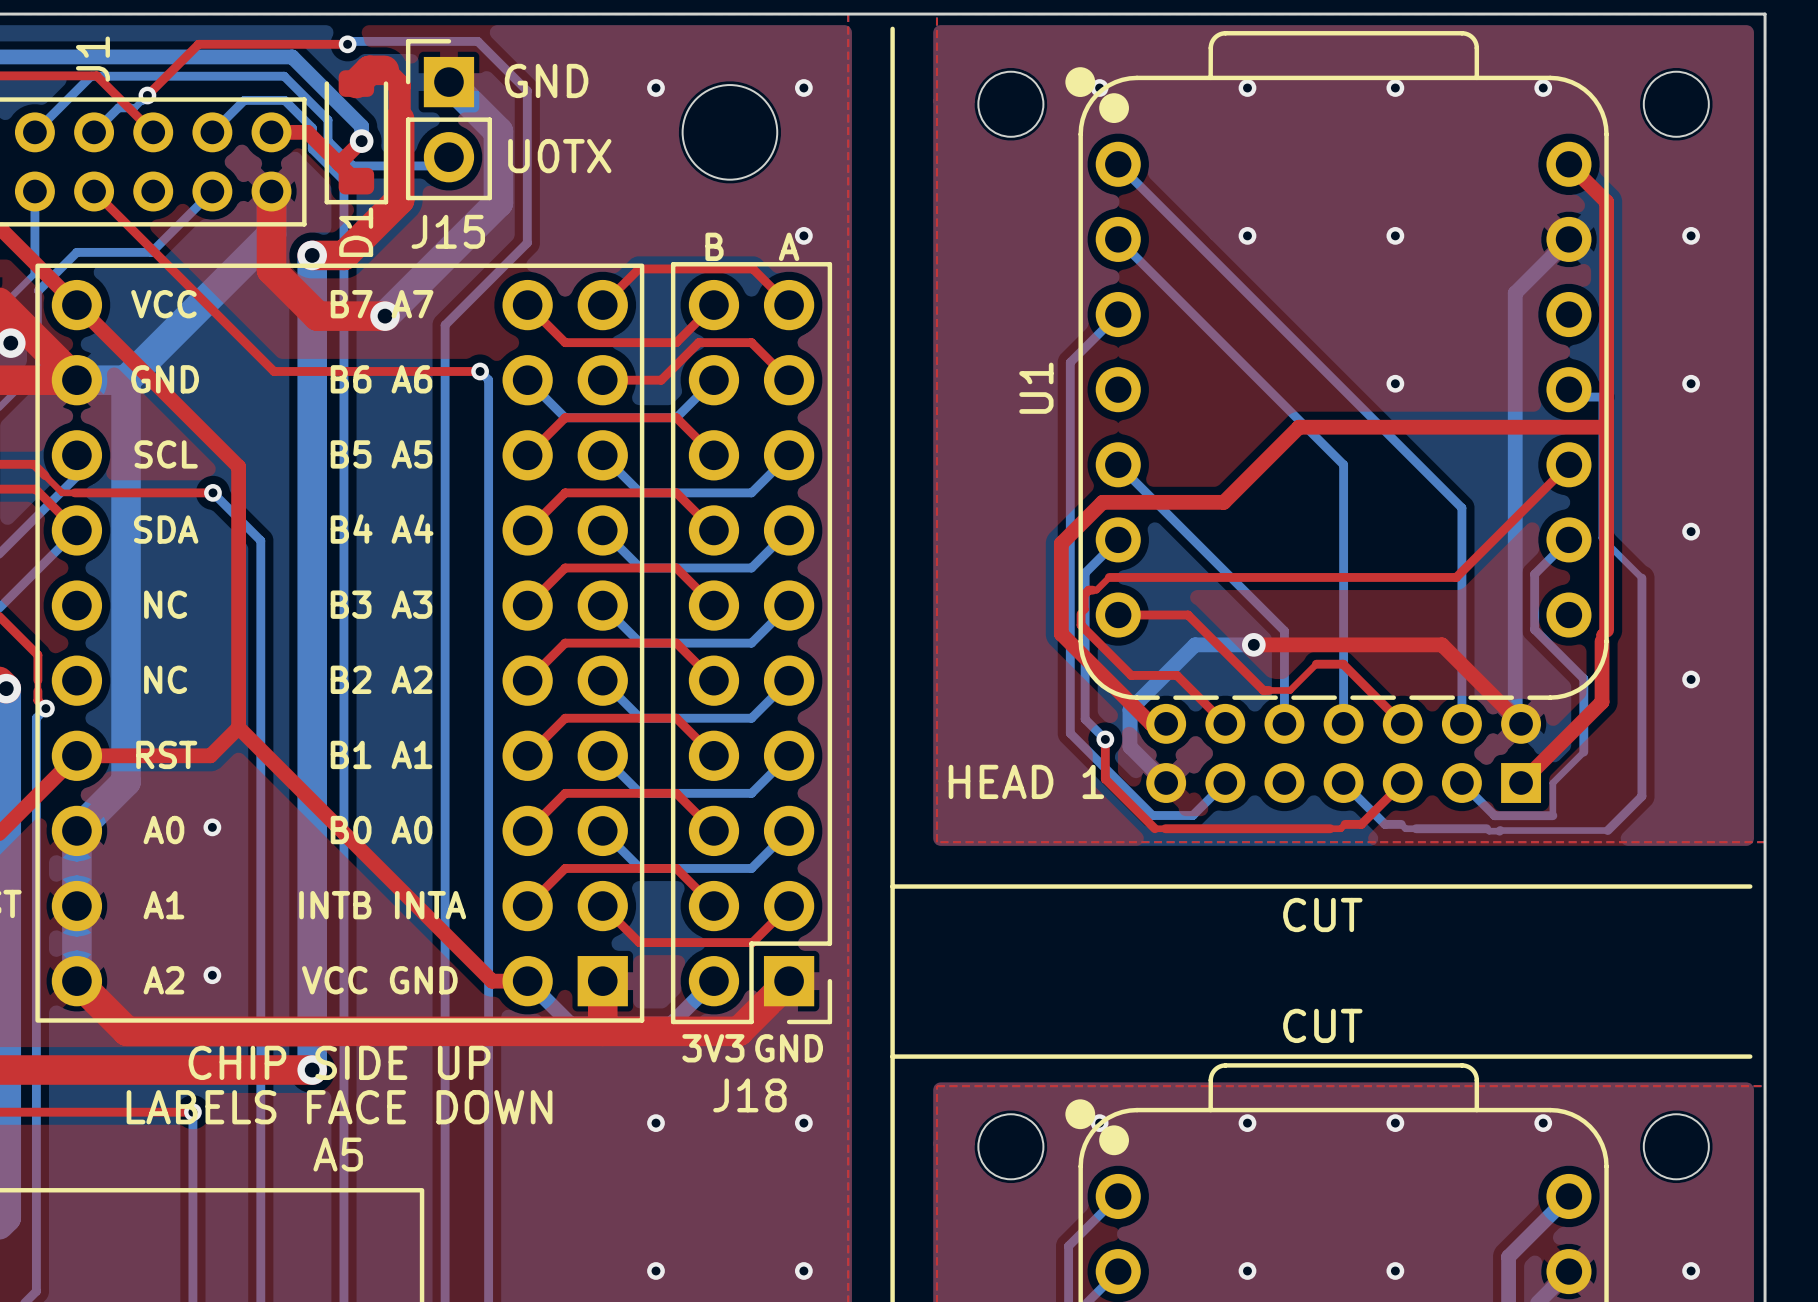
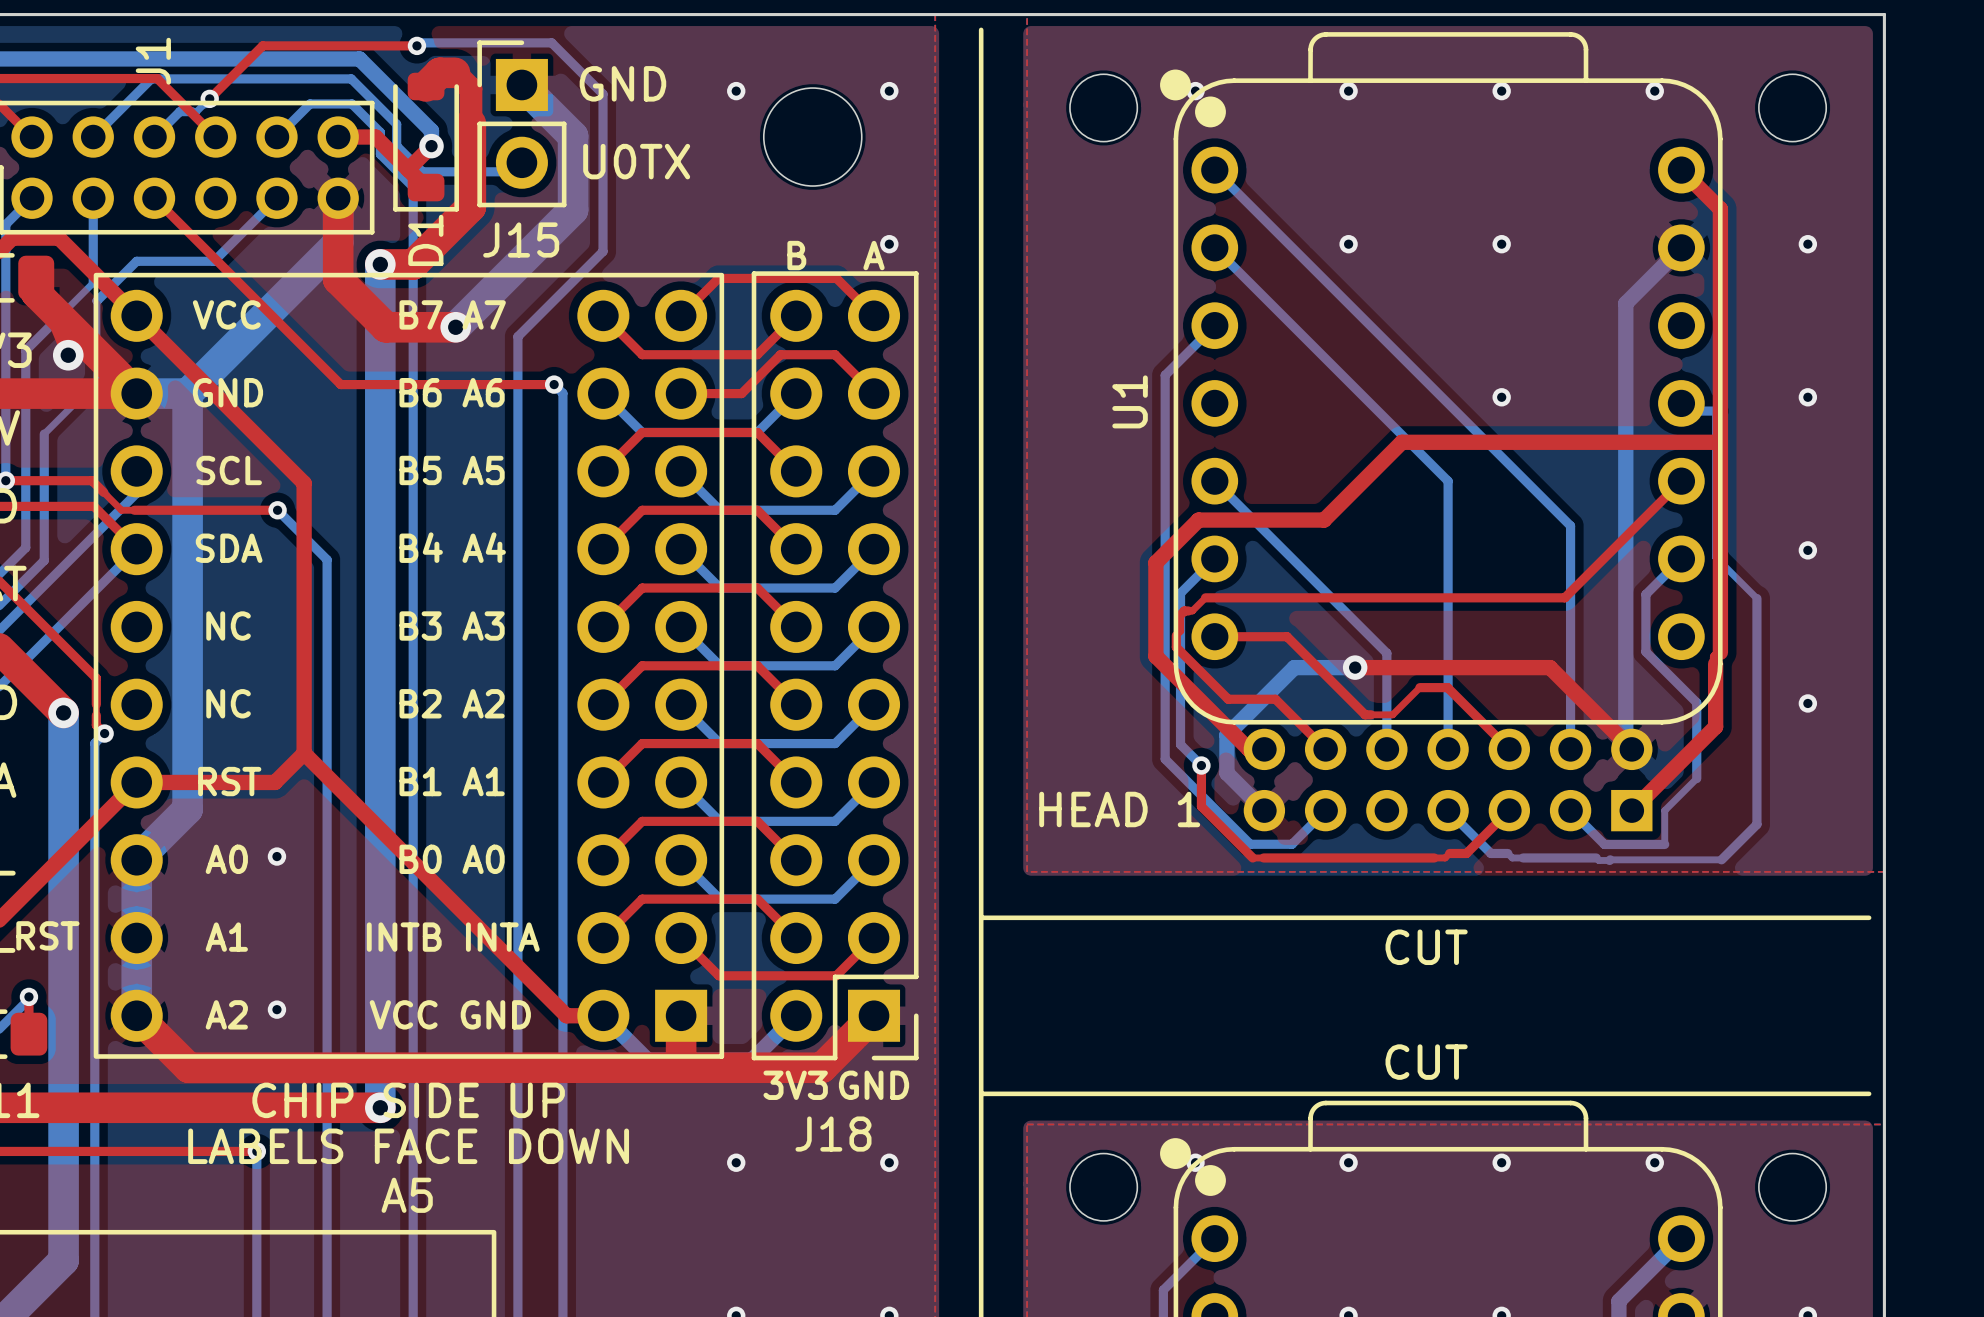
U1 footprint: [1065, 31, 1609, 700] -> [1160, 32, 1723, 725]

